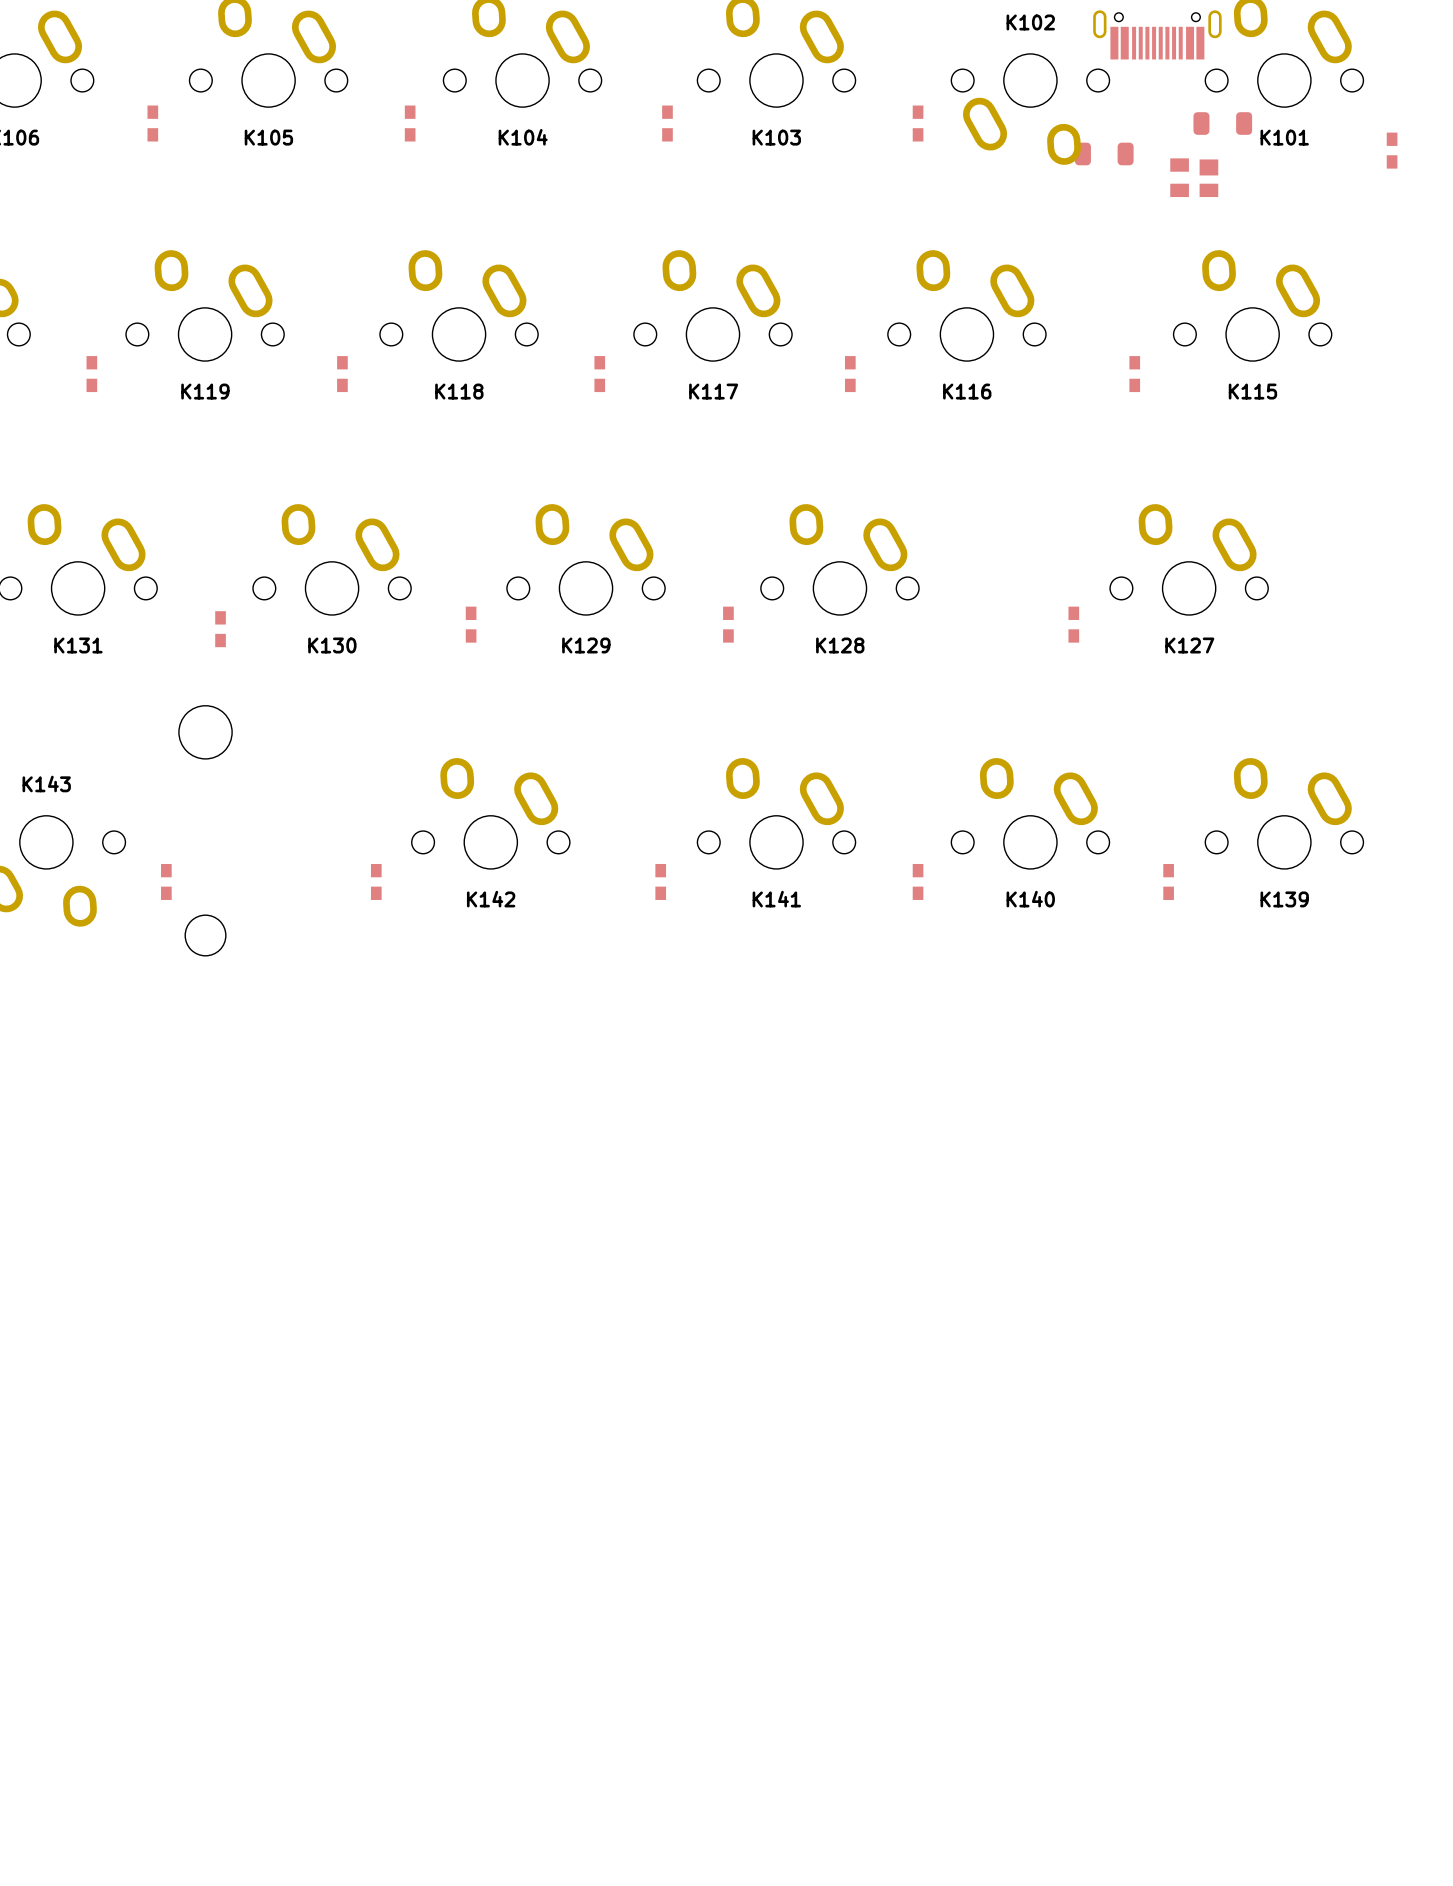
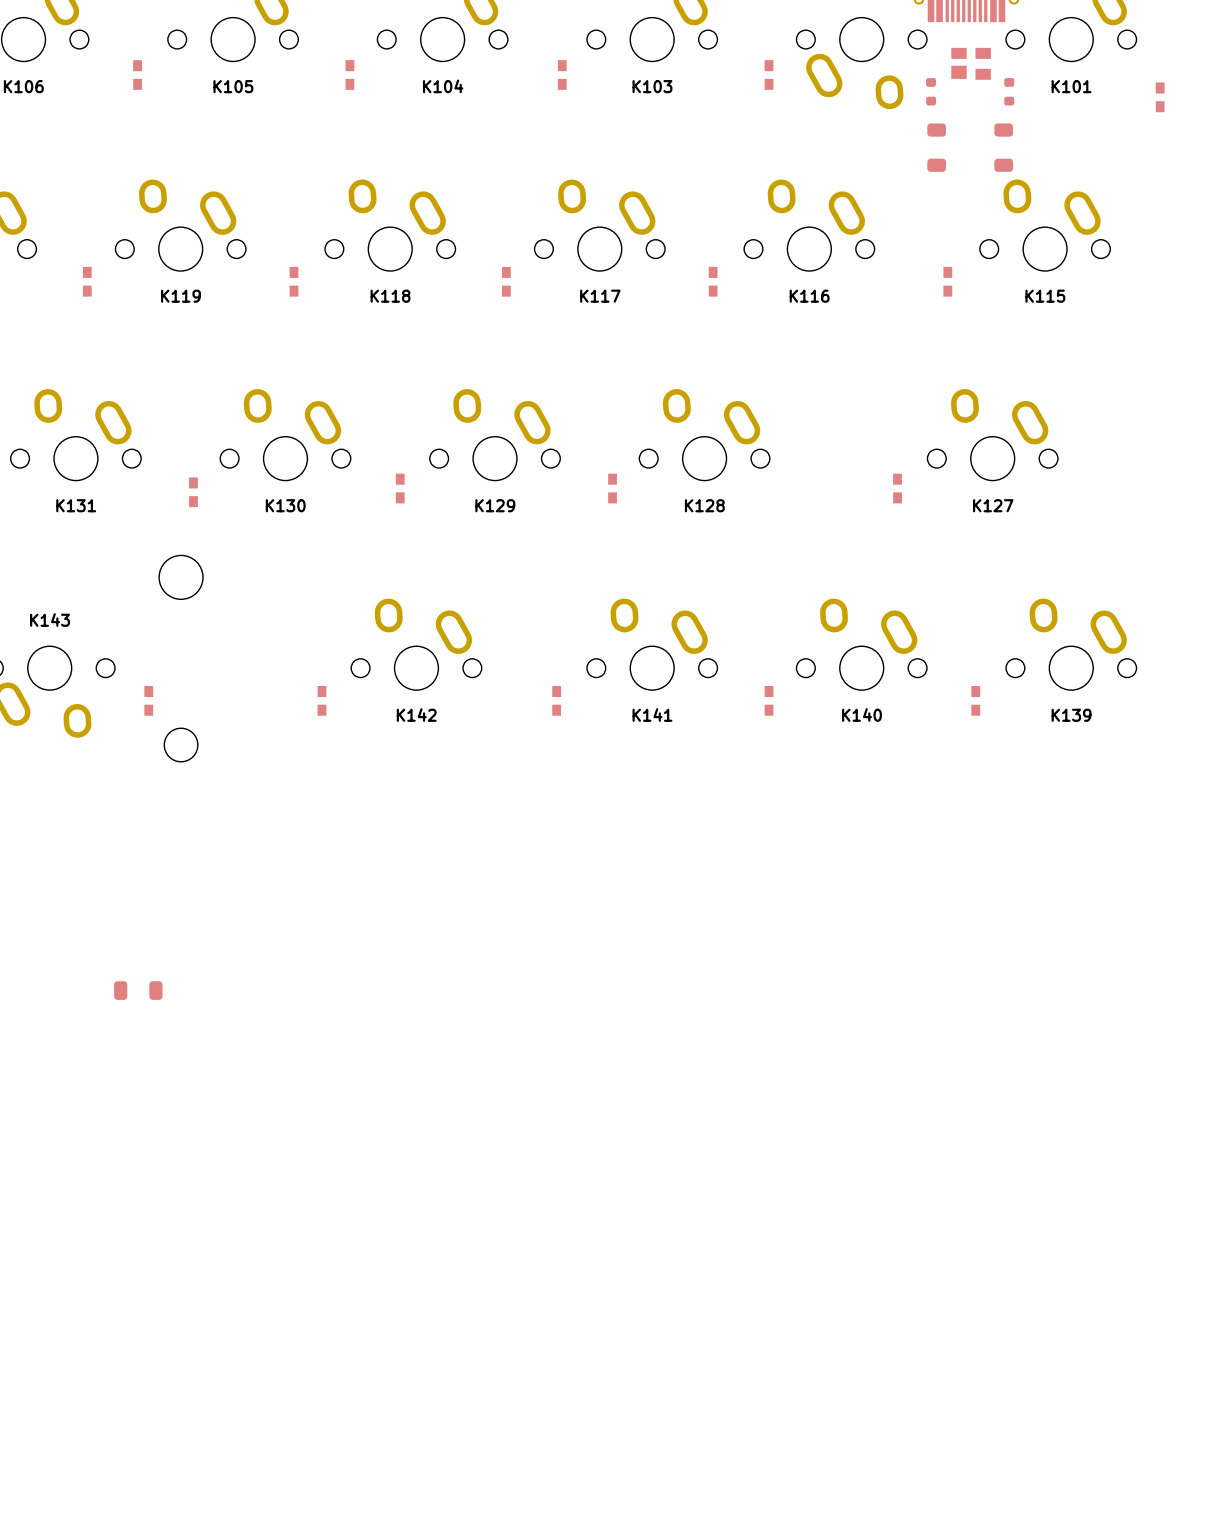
part: (1222, 123) -> none
part: none -> (931, 91)
part: none -> (1009, 91)
part: (1104, 153) -> none
part rotation: 0° (1194, 177) -> 180° (971, 63)
part position: (1194, 177) -> (971, 63)
part: none -> (936, 147)
part: none -> (1003, 147)
part: none -> (138, 990)

